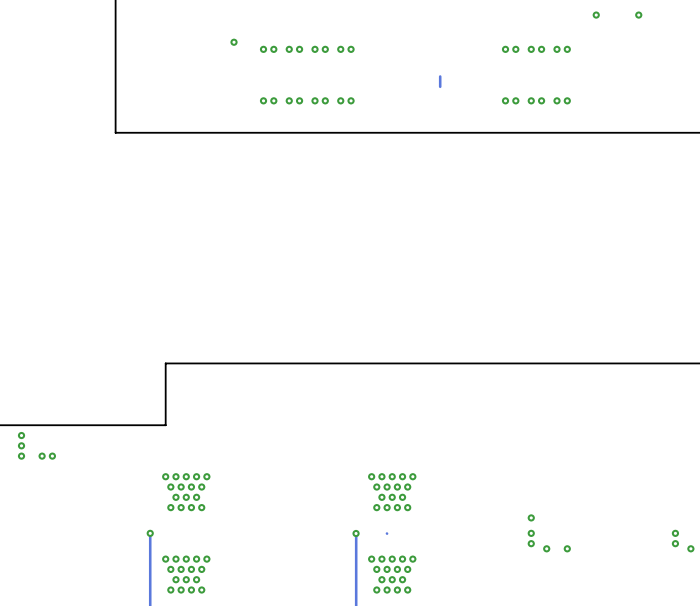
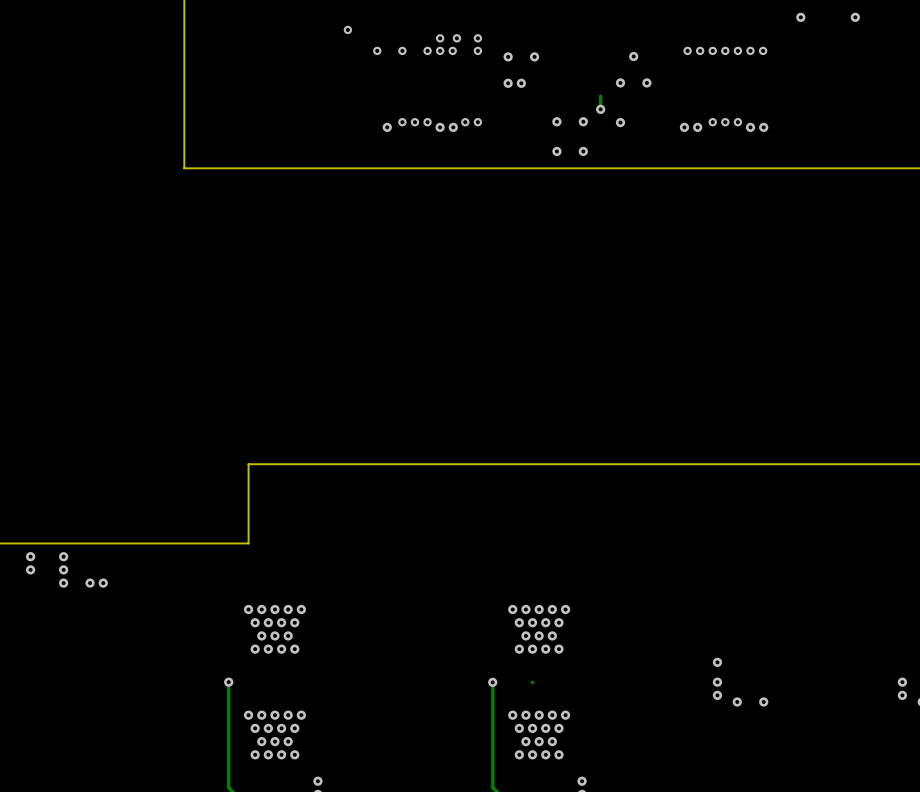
via: none -> (347, 29)
via: none -> (440, 38)
via: none -> (456, 38)
via: none -> (477, 38)
via: none -> (377, 50)
via: none -> (402, 50)
via: none -> (427, 50)
via: none -> (440, 50)
via: none -> (452, 50)
via: none -> (477, 50)
via: none -> (687, 50)
via: none -> (700, 50)
via: none -> (712, 50)
via: none -> (725, 50)
via: none -> (737, 50)
via: none -> (750, 50)
via: none -> (763, 50)
via: (234, 42) -> none
via: none -> (508, 56)
via: none -> (534, 56)
via: none -> (633, 56)
via: (263, 49) -> none
via: (273, 49) -> none
via: (289, 49) -> none
via: (299, 49) -> none
via: (315, 49) -> none
via: (325, 49) -> none
via: (340, 49) -> none
via: (351, 49) -> none
via: (505, 49) -> none
via: (515, 49) -> none
via: (531, 49) -> none
via: (541, 49) -> none
via: (557, 49) -> none
via: (567, 49) -> none
via: none -> (508, 83)
via: none -> (521, 83)
via: none -> (620, 82)
via: none -> (646, 82)
via: none -> (600, 109)
via: none -> (402, 122)
via: none -> (414, 122)
via: none -> (427, 122)
via: none -> (465, 122)
via: none -> (477, 122)
via: none -> (556, 121)
via: none -> (583, 121)
via: none -> (712, 122)
via: none -> (725, 122)
via: none -> (737, 122)
via: none -> (620, 122)
via: (263, 100) -> none
via: (289, 100) -> none
via: (299, 100) -> none
via: (340, 100) -> none
via: (351, 100) -> none
via: (531, 100) -> none
via: (541, 100) -> none
via: none -> (556, 151)
via: none -> (583, 151)

